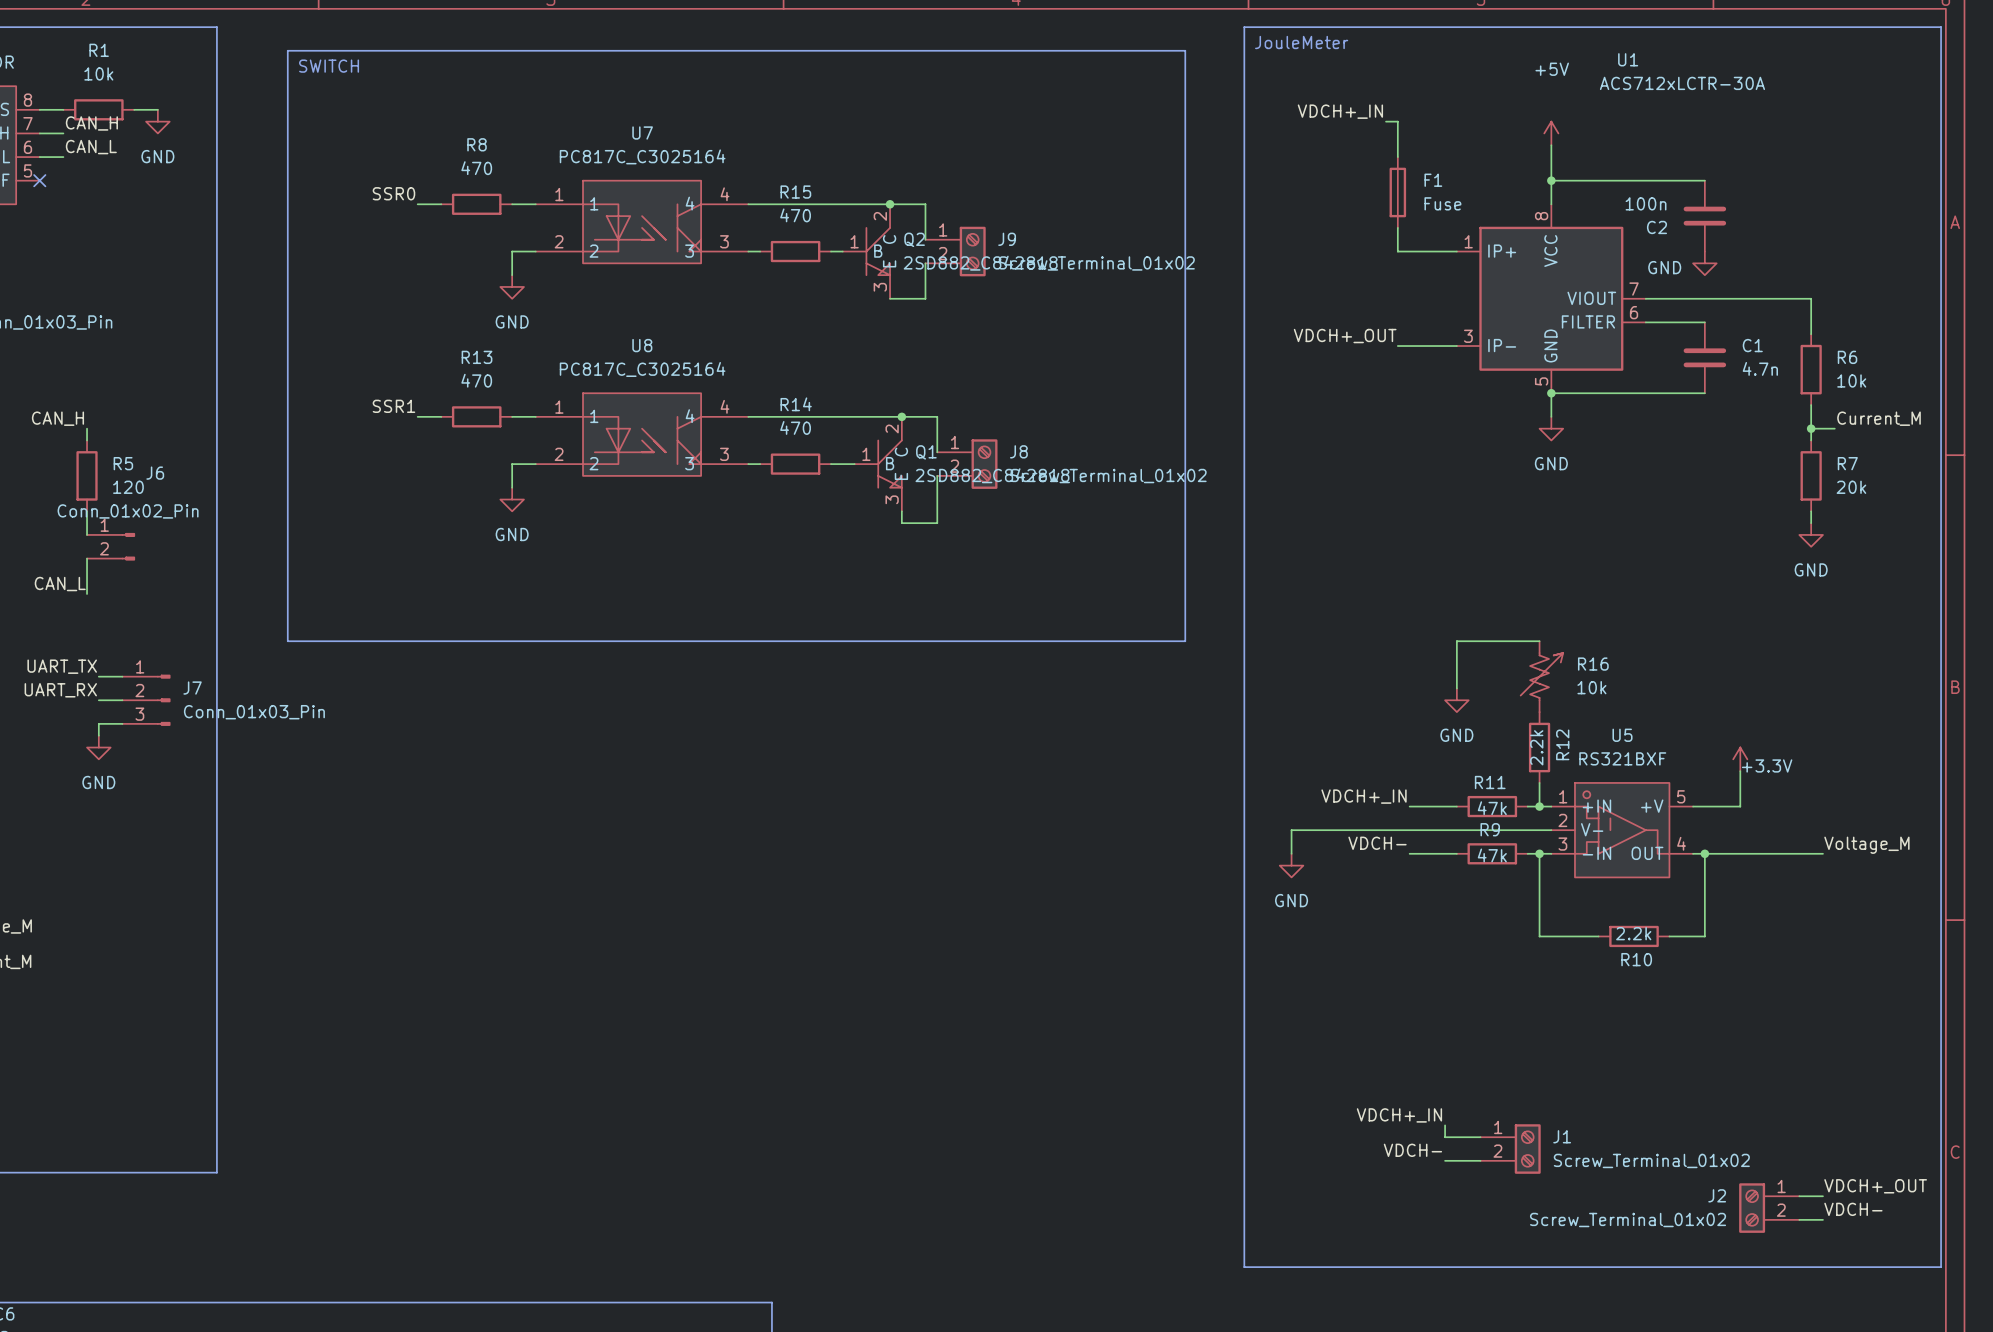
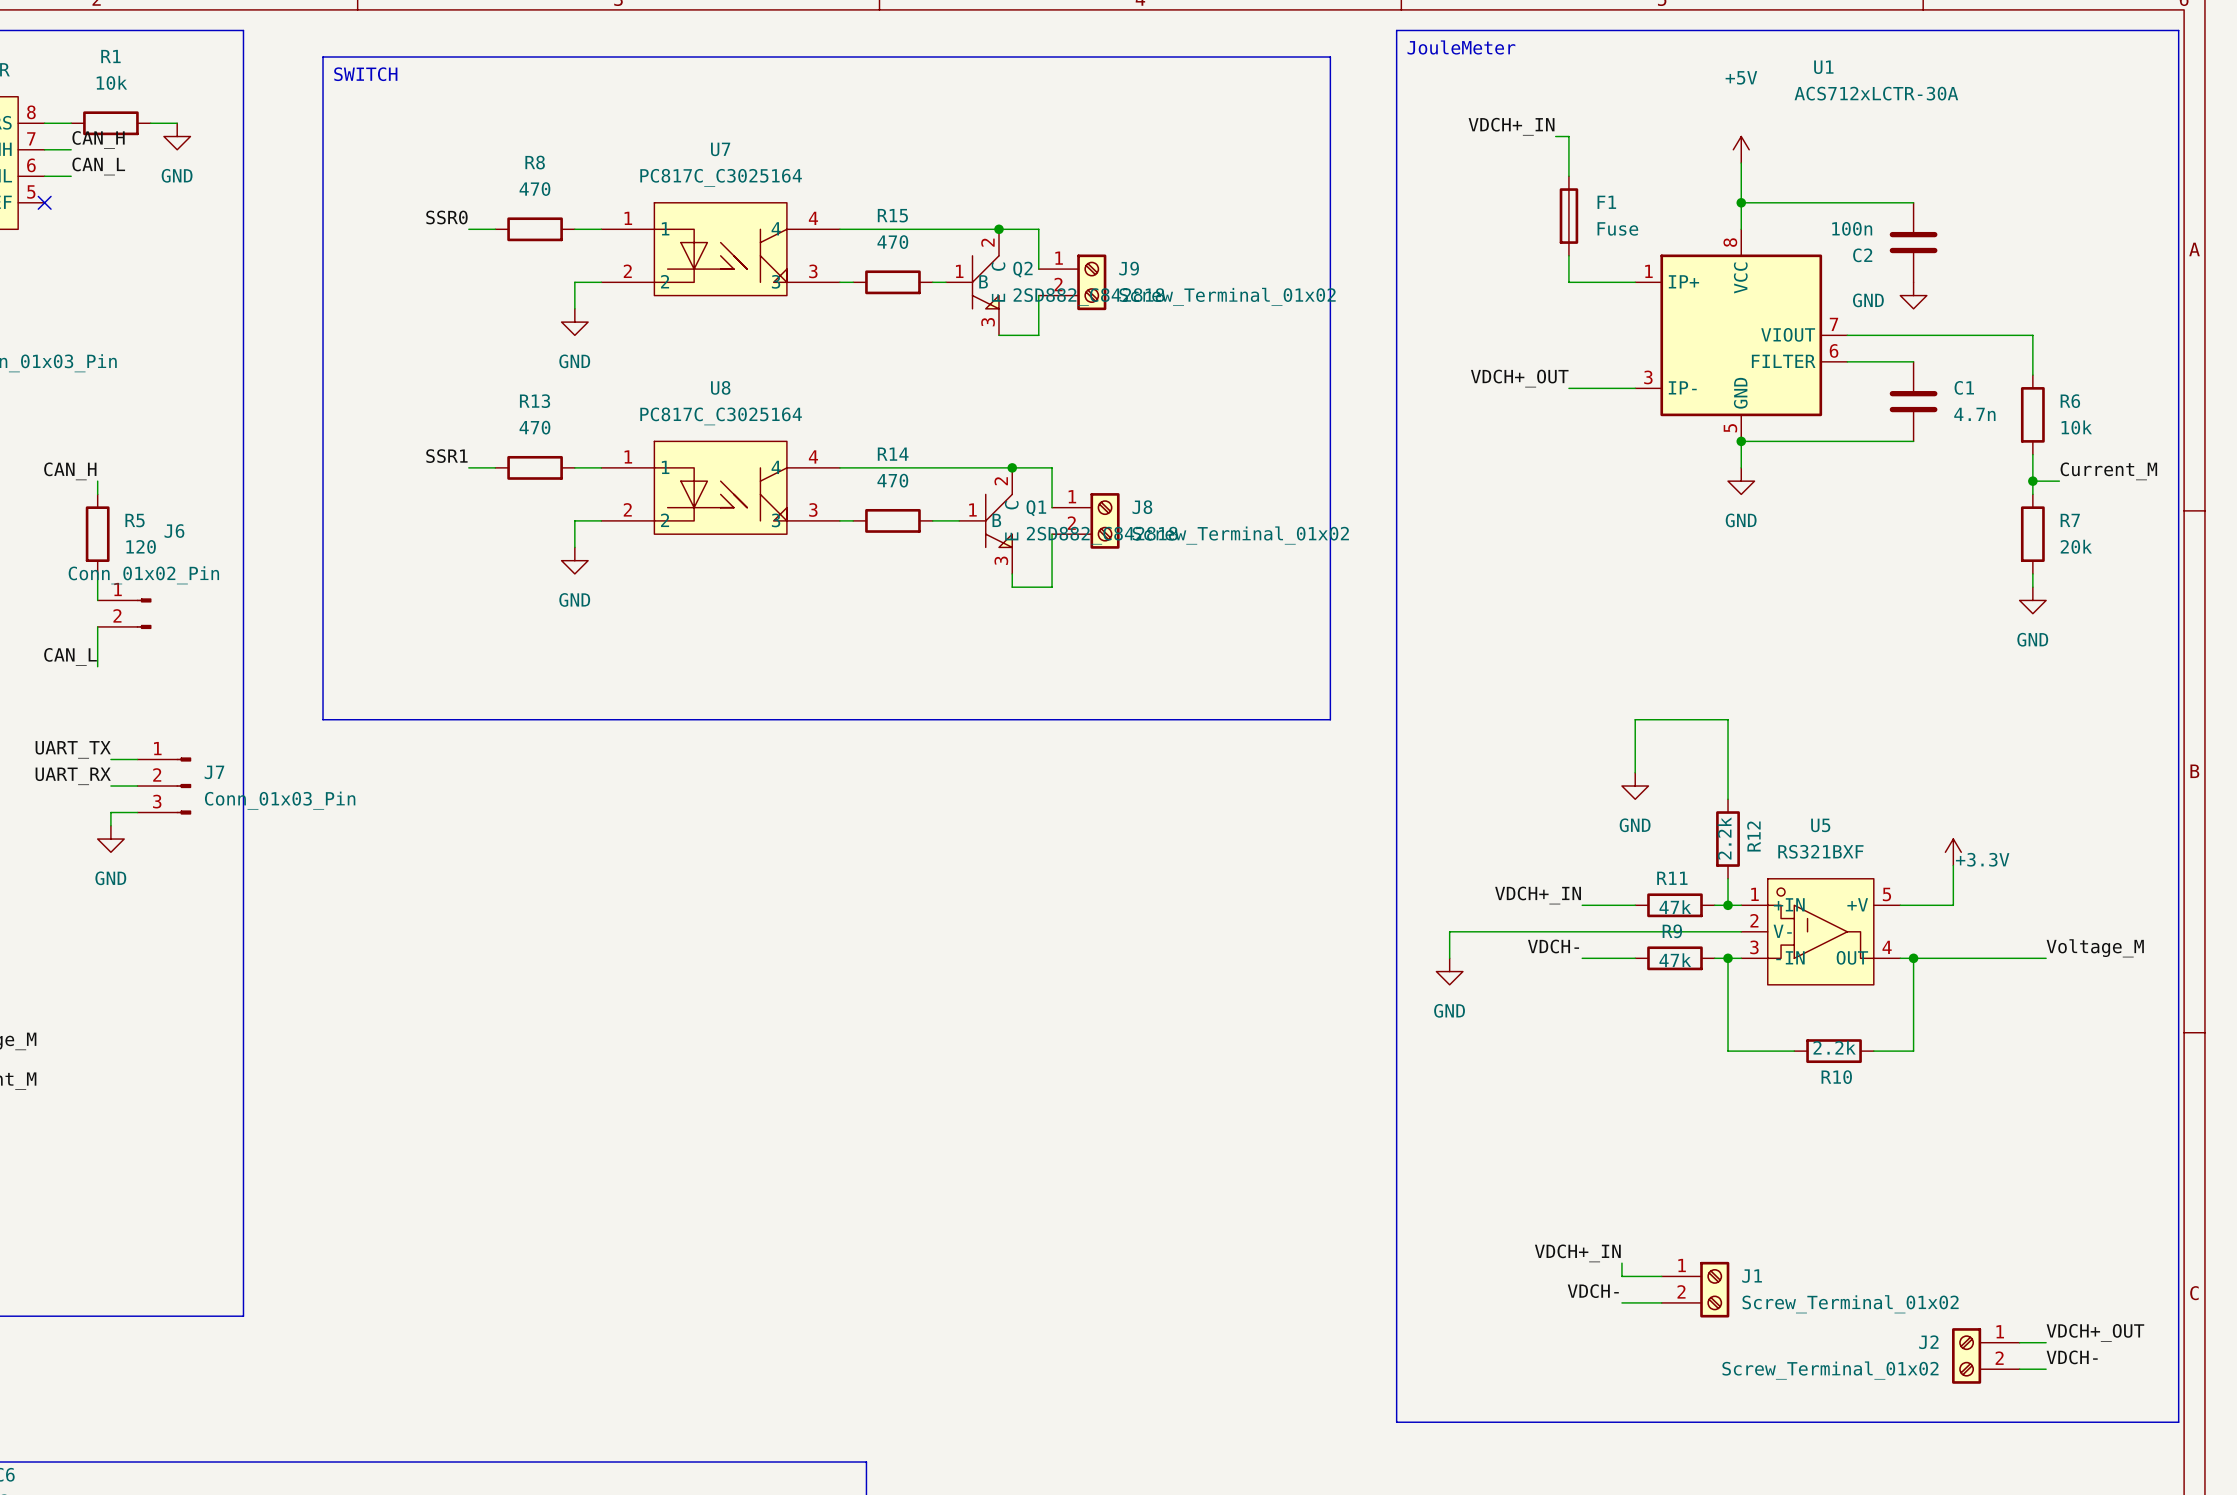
R16: 10k (1541, 676) -> none

